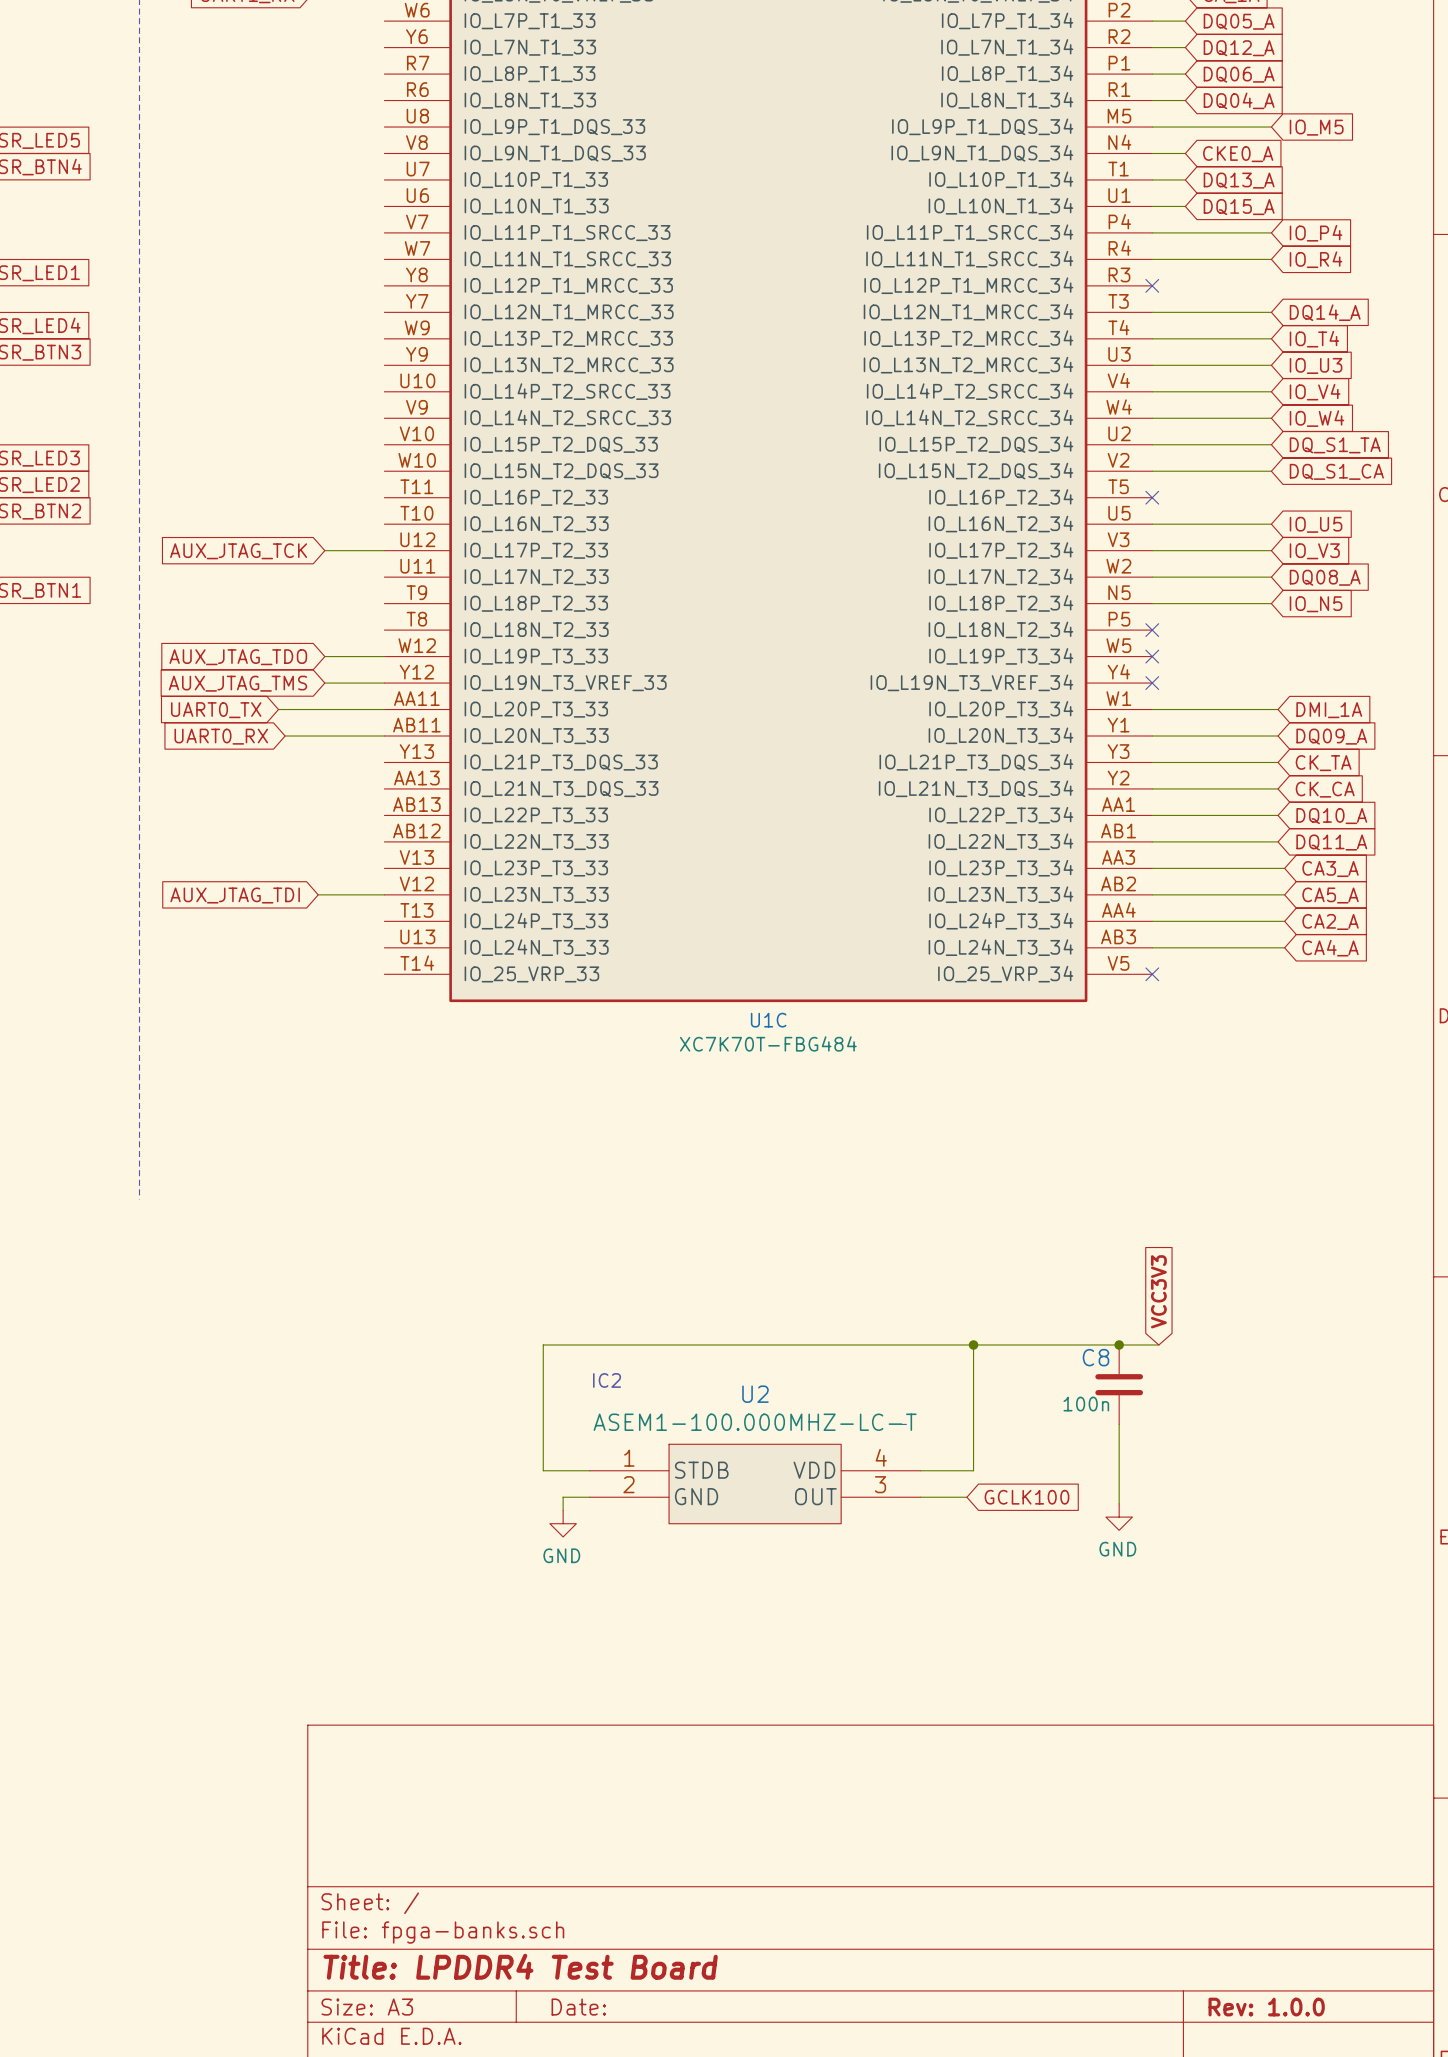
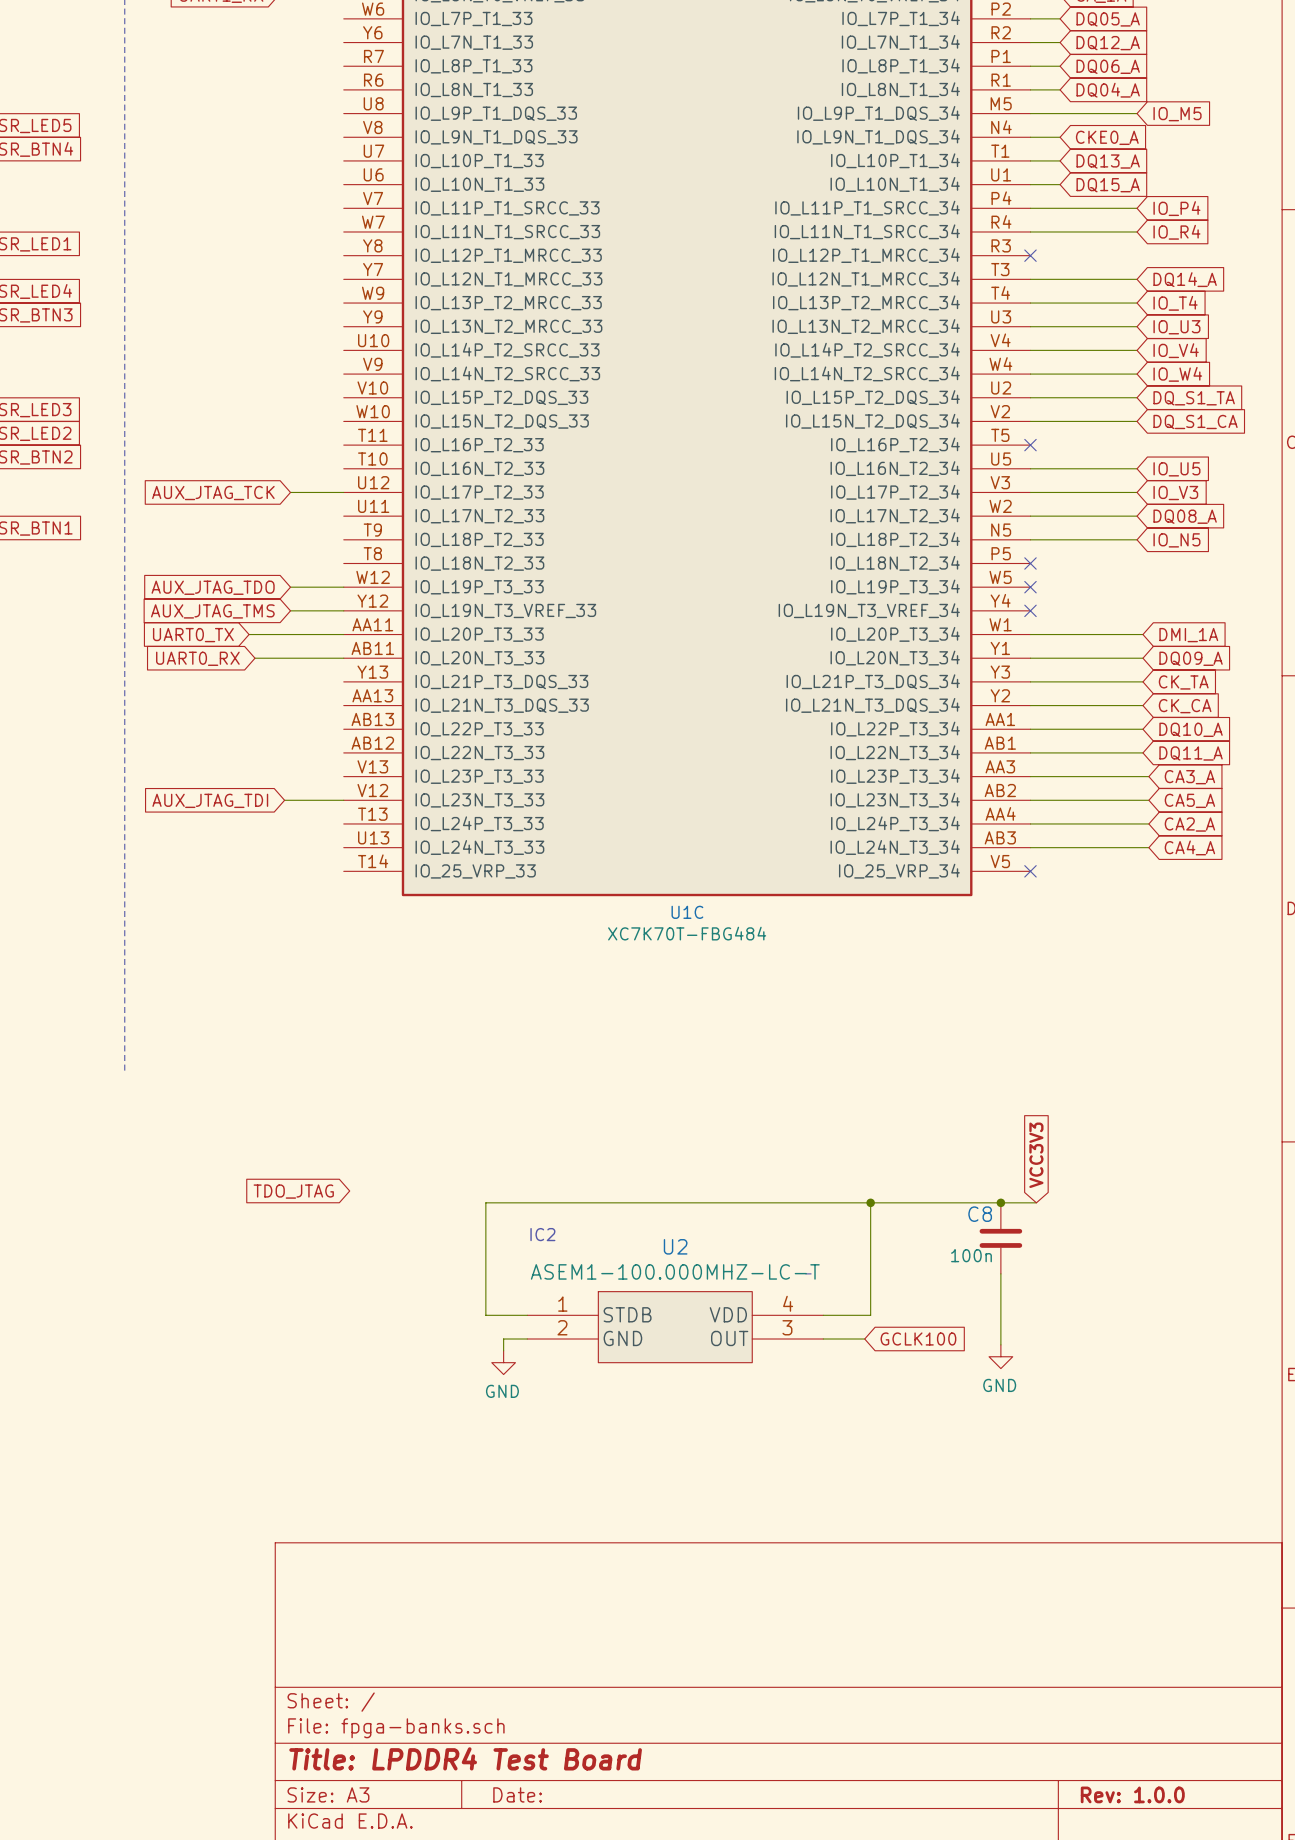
global label: none -> TDO_JTAG (293, 1191)

